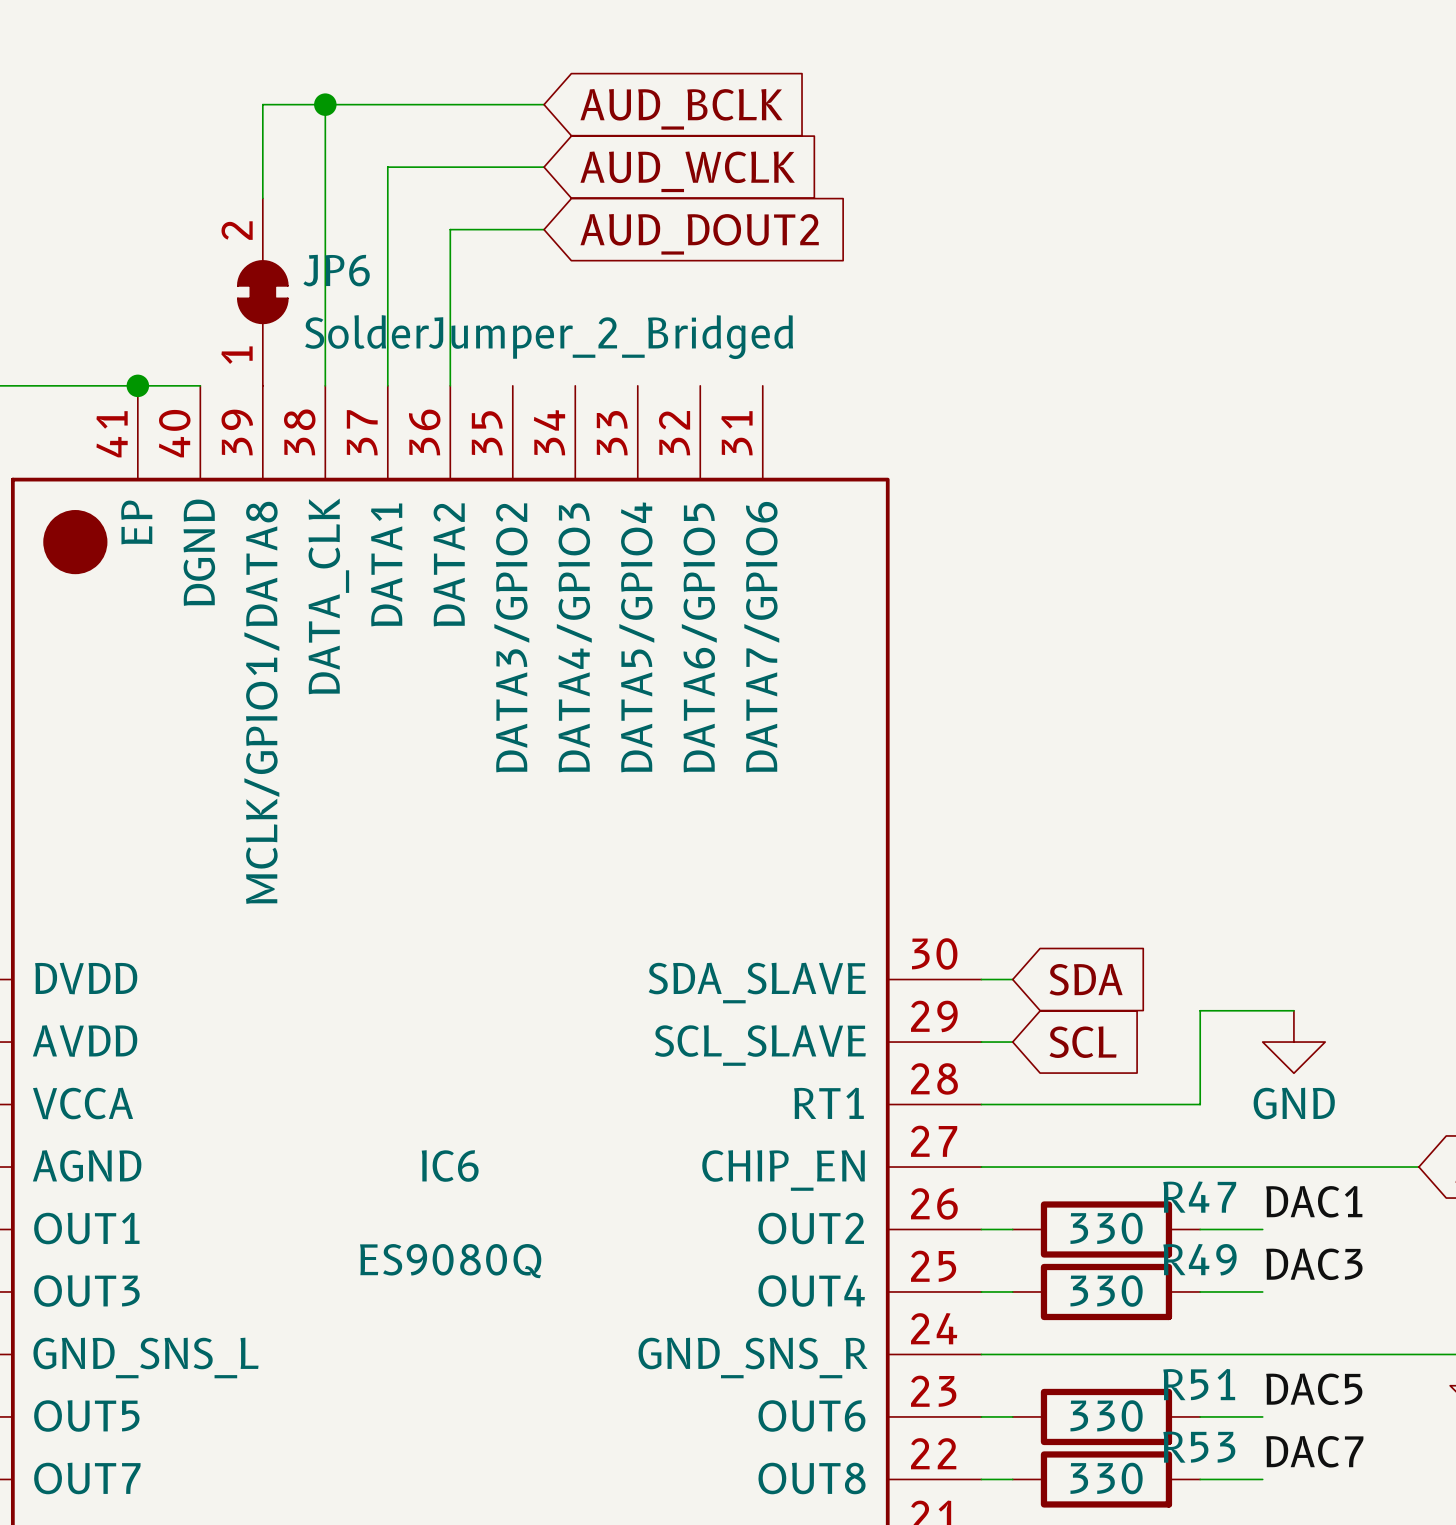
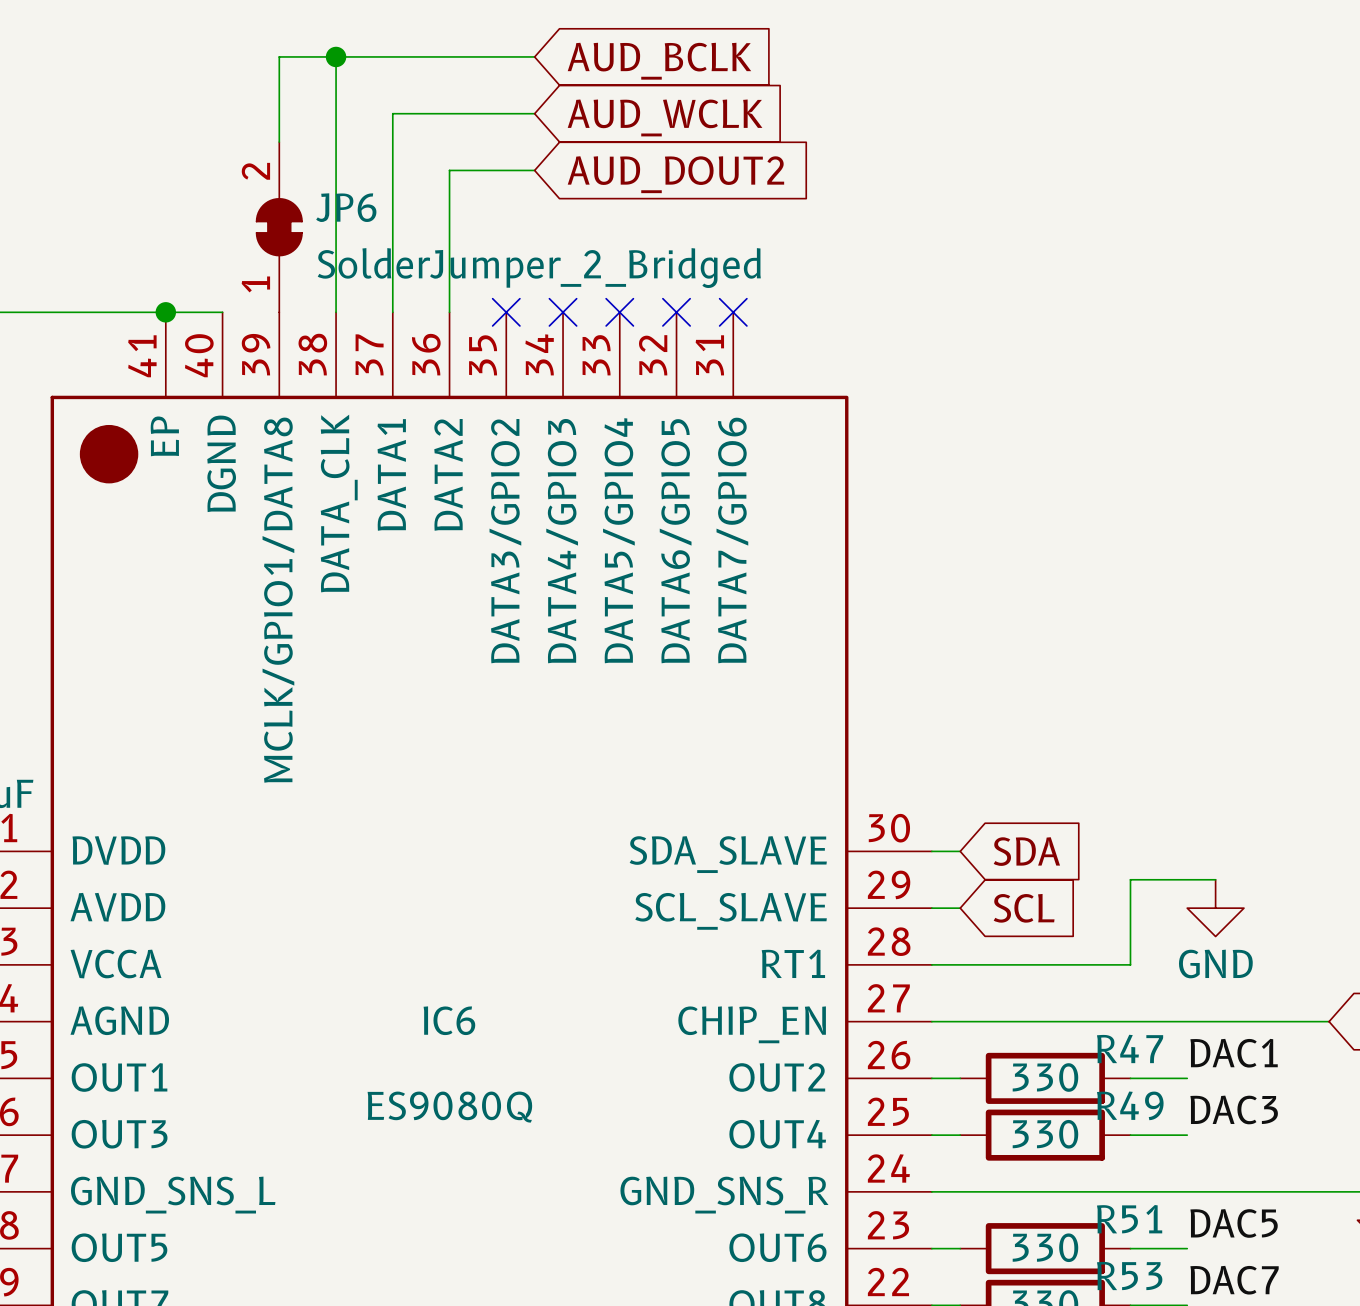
no-connect mark: none -> (506, 312)
no-connect mark: none -> (563, 312)
no-connect mark: none -> (619, 312)
no-connect mark: none -> (676, 312)
no-connect mark: none -> (733, 312)

